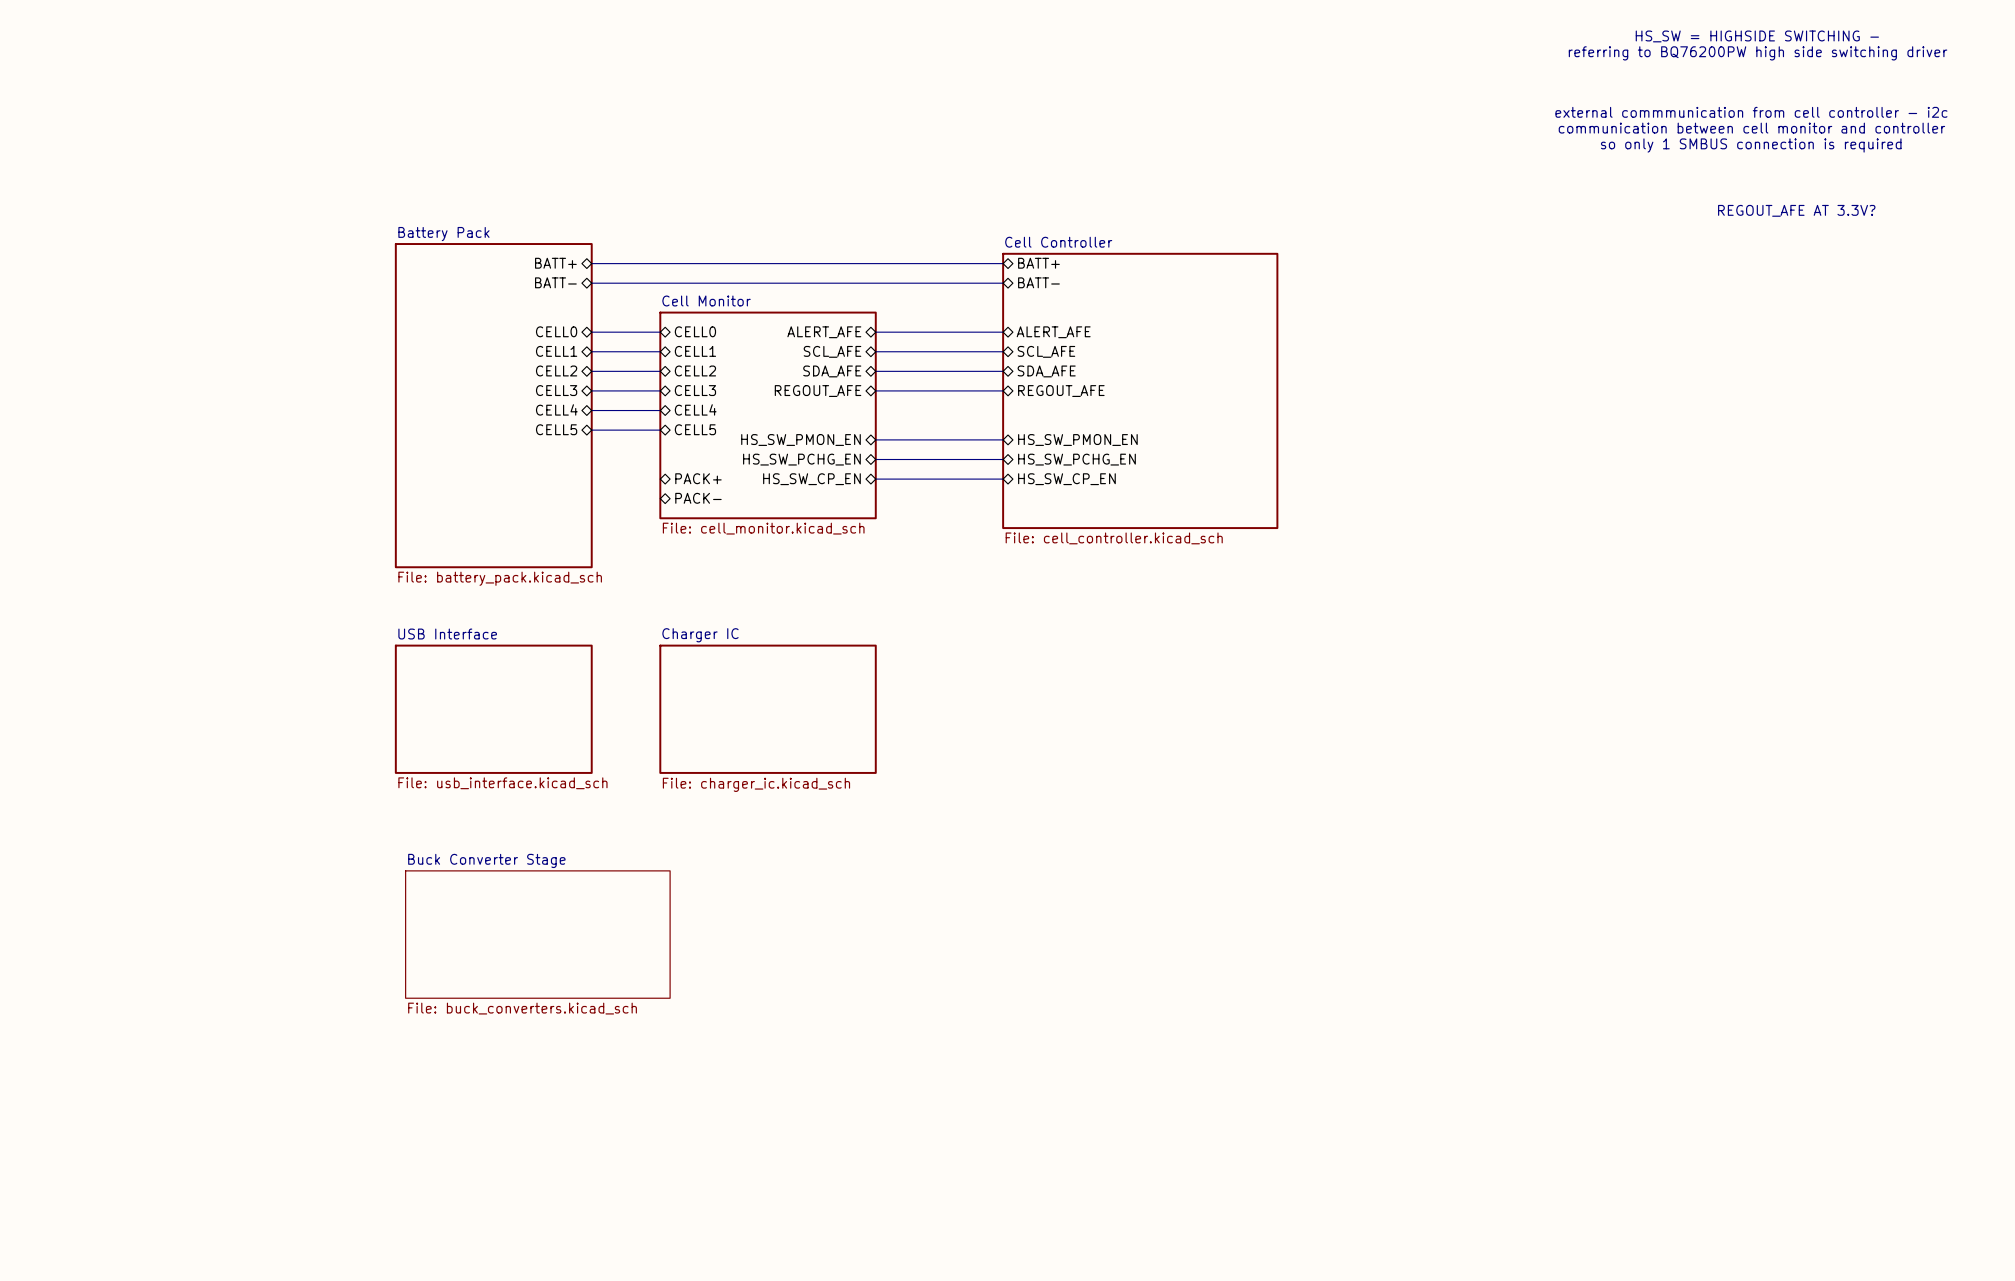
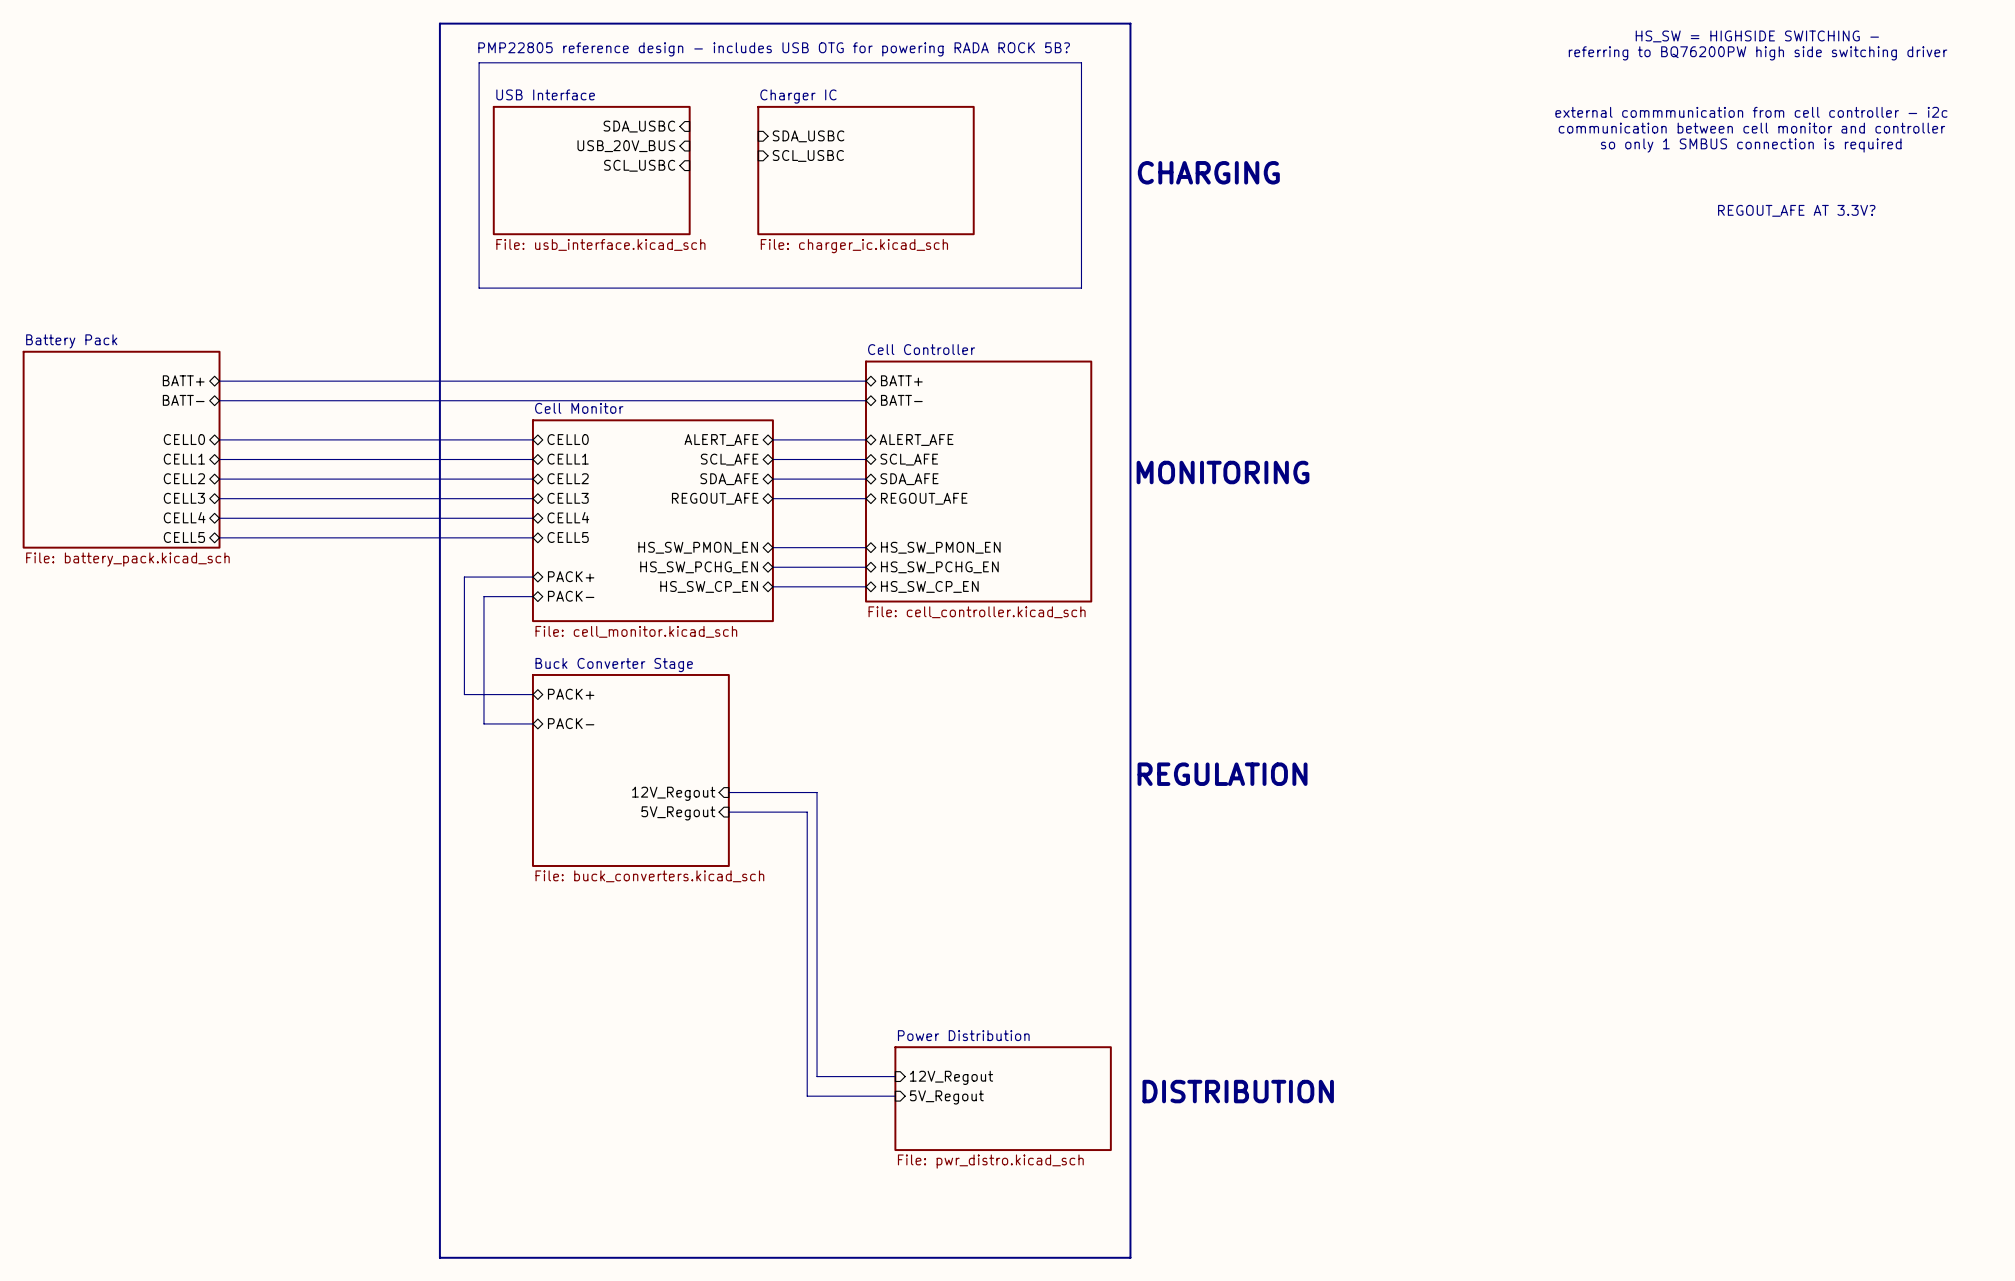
line: none -> (439, 23) (1130, 23) (1130, 1257) (439, 1257) (439, 23)
text: none -> PMP22805 reference design - includes USB OTG for powering RADA ROCK 5B? (774, 49)
line: none -> (479, 62) (1081, 62) (1081, 288) (479, 288) (479, 62)
sheet pin: none -> SDA_USBC (639, 126)
sheet pin: none -> SDA_USBC (808, 136)
sheet pin: none -> USB_20V_BUS (626, 146)
sheet pin: none -> SCL_USBC (808, 155)
sheet pin: none -> SCL_USBC (639, 165)
sheet USB Interface: none -> File: usb_interface.kicad_sch (591, 170)
sheet Charger IC: none -> File: charger_ic.kicad_sch (865, 170)
text: none -> CHARGING (1208, 172)
sheet pin: BATT+ (555, 263) -> none
wire: (591, 263) (1003, 263) -> none
sheet pin: BATT+ (1038, 263) -> none
sheet pin: BATT- (555, 282) -> none
sheet pin: BATT- (1038, 282) -> none
wire: (591, 283) (1003, 283) -> none
sheet pin: CELL0 (556, 331) -> none
sheet pin: CELL0 (695, 331) -> none
wire: (591, 332) (660, 332) -> none
sheet pin: ALERT_AFE (824, 332) -> none
wire: (875, 332) (1003, 332) -> none
sheet pin: ALERT_AFE (1053, 332) -> none
sheet pin: CELL1 (556, 351) -> none
wire: (591, 351) (660, 351) -> none
sheet pin: CELL1 (695, 351) -> none
sheet pin: SCL_AFE (832, 351) -> none
wire: (875, 351) (1003, 351) -> none
sheet pin: SCL_AFE (1046, 351) -> none
sheet pin: CELL2 (556, 370) -> none
sheet pin: CELL2 (695, 370) -> none
wire: (591, 371) (660, 371) -> none
sheet pin: SDA_AFE (832, 371) -> none
wire: (875, 371) (1003, 371) -> none
sheet pin: SDA_AFE (1046, 371) -> none
sheet pin: none -> BATT+ (183, 380)
sheet pin: none -> BATT+ (901, 380)
wire: none -> (219, 381) (865, 381)
sheet pin: CELL3 (556, 390) -> none
wire: (591, 390) (660, 390) -> none
sheet pin: CELL3 (695, 390) -> none
wire: (875, 390) (1003, 390) -> none
sheet Cell Controller: File: cell_controller.kicad_sch (1140, 390) -> none
sheet pin: REGOUT_AFE (818, 391) -> none
sheet pin: REGOUT_AFE (1061, 391) -> none
sheet pin: none -> BATT- (183, 400)
wire: none -> (219, 400) (865, 400)
sheet pin: none -> BATT- (901, 400)
sheet Battery Pack: File: battery_pack.kicad_sch (493, 405) -> none
sheet pin: CELL4 (556, 409) -> none
sheet pin: CELL4 (695, 409) -> none
wire: (591, 410) (660, 410) -> none
sheet Cell Monitor: File: cell_monitor.kicad_sch (768, 415) -> none
sheet pin: CELL5 (556, 429) -> CELL0 (568, 439)
sheet pin: CELL5 (695, 429) -> none
wire: (591, 430) (660, 430) -> none
sheet pin: none -> CELL0 (184, 439)
wire: none -> (219, 439) (532, 439)
wire: none -> (772, 439) (865, 439)
wire: (875, 439) (1003, 439) -> none
sheet pin: none -> ALERT_AFE (721, 440)
sheet pin: HS_SW_PMON_EN (801, 440) -> none
sheet pin: none -> ALERT_AFE (916, 440)
sheet pin: HS_SW_PMON_EN (1077, 440) -> none
sheet Battery Pack: none -> File: battery_pack.kicad_sch (121, 449)
sheet pin: none -> CELL1 (184, 459)
wire: none -> (219, 459) (532, 459)
sheet pin: none -> CELL1 (568, 459)
sheet pin: none -> SCL_AFE (729, 459)
wire: none -> (772, 459) (865, 459)
sheet pin: HS_SW_PCHG_EN (801, 459) -> none
wire: (875, 459) (1003, 459) -> none
sheet pin: none -> SCL_AFE (909, 459)
sheet pin: HS_SW_PCHG_EN (1076, 459) -> none
text: none -> MONITORING (1222, 472)
sheet pin: none -> CELL2 (184, 478)
sheet pin: none -> CELL2 (568, 478)
sheet pin: PACK+ (698, 478) -> none
wire: none -> (219, 479) (532, 479)
sheet pin: none -> SDA_AFE (729, 479)
wire: none -> (772, 479) (865, 479)
sheet pin: HS_SW_CP_EN (811, 479) -> none
wire: (875, 479) (1003, 479) -> none
sheet pin: none -> SDA_AFE (909, 479)
sheet pin: HS_SW_CP_EN (1066, 479) -> none
sheet Cell Controller: none -> File: cell_controller.kicad_sch (978, 481)
sheet pin: none -> CELL3 (184, 498)
wire: none -> (219, 498) (532, 498)
sheet pin: none -> CELL3 (568, 498)
sheet pin: PACK- (698, 498) -> none
sheet pin: none -> REGOUT_AFE (715, 498)
wire: none -> (772, 498) (865, 498)
sheet pin: none -> REGOUT_AFE (924, 498)
sheet pin: none -> CELL4 (184, 517)
sheet pin: none -> CELL4 (568, 517)
wire: none -> (219, 518) (532, 518)
sheet Cell Monitor: none -> File: cell_monitor.kicad_sch (652, 520)
sheet pin: none -> CELL5 (184, 537)
wire: none -> (219, 537) (532, 537)
sheet pin: none -> CELL5 (568, 537)
sheet pin: none -> HS_SW_PMON_EN (698, 547)
wire: none -> (772, 547) (865, 547)
sheet pin: none -> HS_SW_PMON_EN (940, 547)
sheet pin: none -> HS_SW_PCHG_EN (699, 567)
wire: none -> (772, 567) (865, 567)
sheet pin: none -> HS_SW_PCHG_EN (939, 567)
sheet pin: none -> PACK+ (571, 576)
wire: none -> (532, 577) (464, 577) (464, 694) (532, 694)
sheet pin: none -> HS_SW_CP_EN (709, 586)
wire: none -> (772, 586) (865, 586)
sheet pin: none -> HS_SW_CP_EN (929, 586)
wire: none -> (532, 596) (483, 596) (483, 723) (532, 723)
sheet pin: none -> PACK- (571, 596)
sheet pin: none -> PACK+ (571, 694)
sheet USB Interface: File: usb_interface.kicad_sch (493, 709) -> none
sheet Charger IC: File: charger_ic.kicad_sch (768, 709) -> none
sheet pin: none -> PACK- (571, 723)
sheet Buck Converter Stage: none -> File: buck_converters.kicad_sch (630, 770)
text: none -> REGULATION (1222, 774)
wire: none -> (728, 792) (817, 792) (817, 1076) (895, 1076)
sheet pin: none -> 12V_Regout (673, 793)
wire: none -> (728, 812) (807, 812) (807, 1096) (895, 1096)
sheet pin: none -> 5V_Regout (678, 813)
sheet Buck Converter Stage: File: buck_converters.kicad_sch (537, 934) -> none
sheet pin: none -> 12V_Regout (951, 1077)
text: none -> DISTRIBUTION (1238, 1091)
sheet pin: none -> 5V_Regout (946, 1097)
sheet Power Distribution: none -> File: pwr_distro.kicad_sch (1003, 1098)

